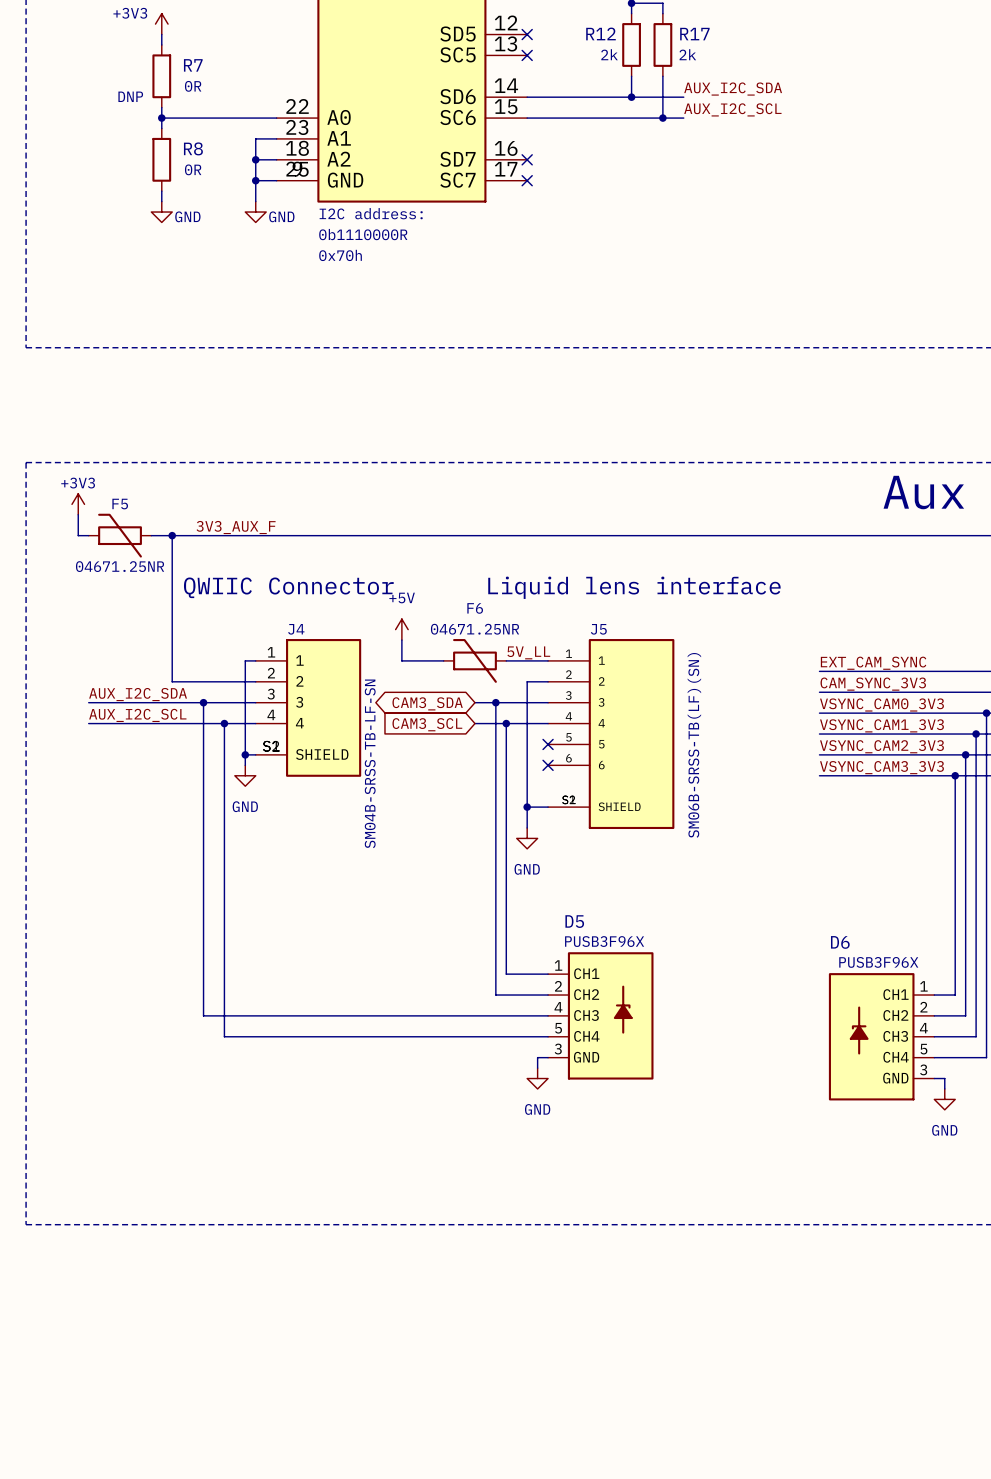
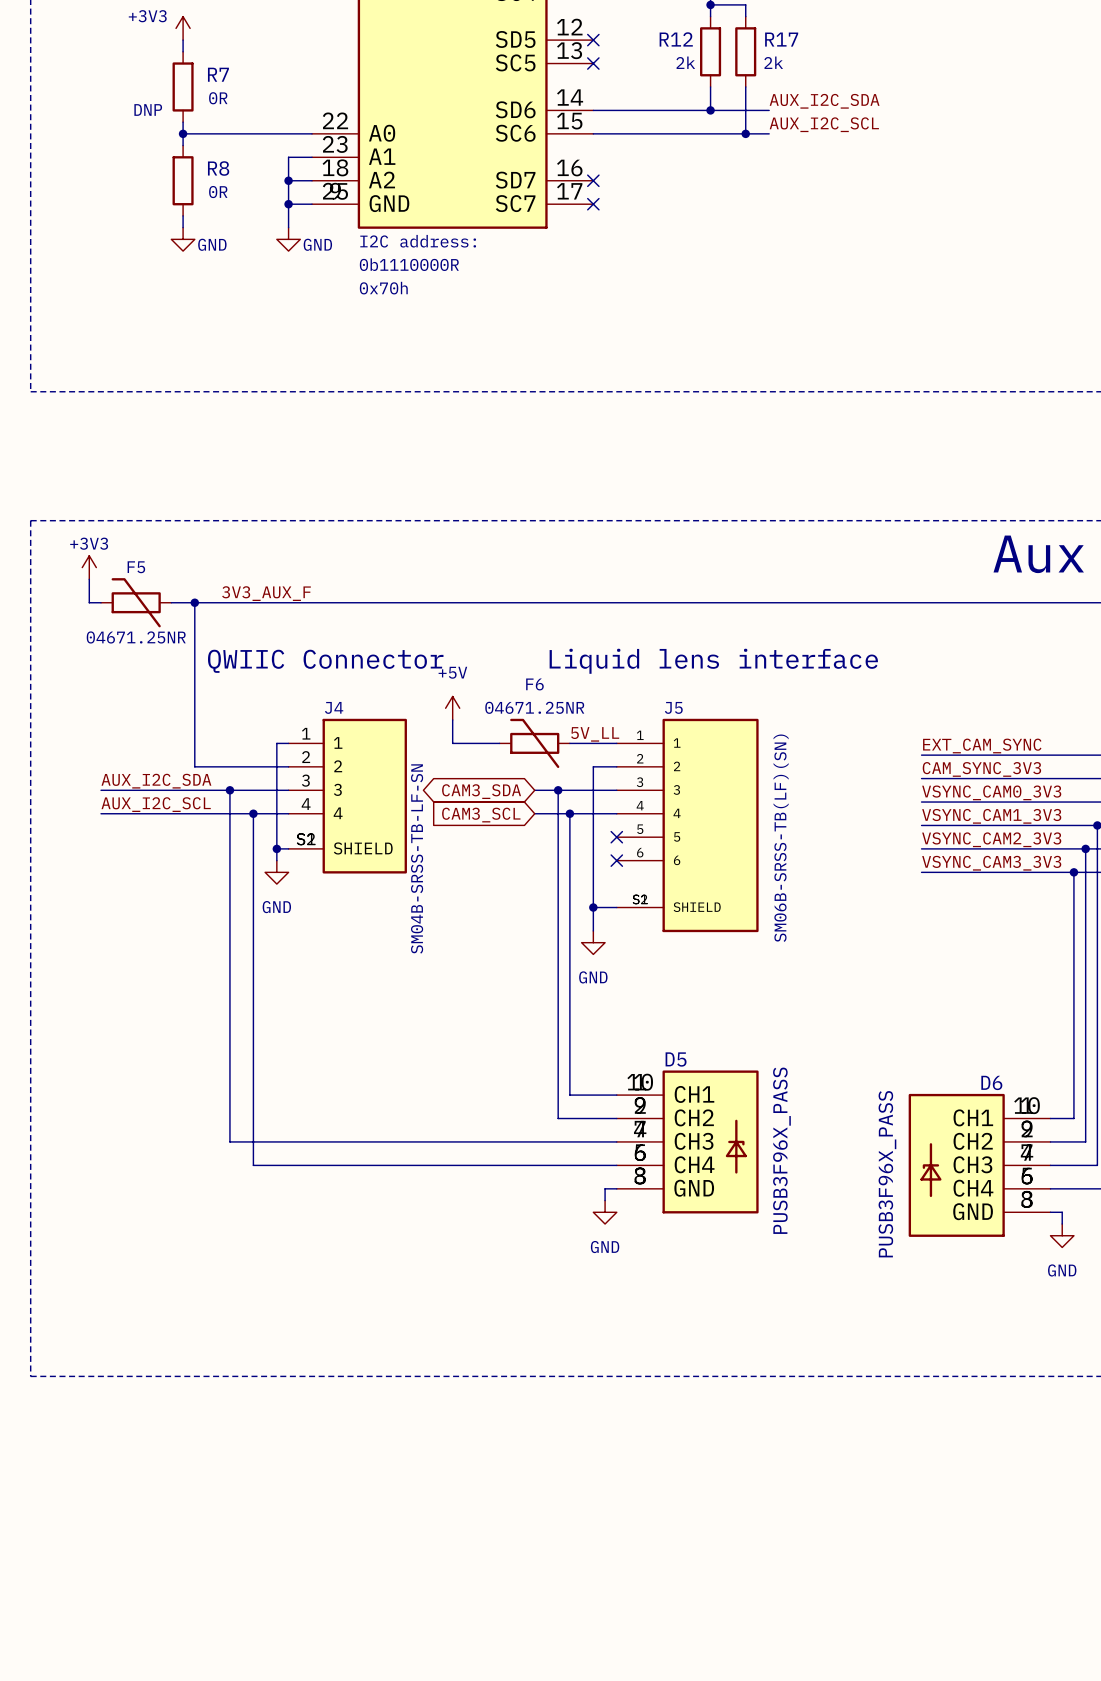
D5 name position: D5 (574, 921) -> D5 (676, 1059)
D5 text: PUSB3F96X (604, 941) -> none
D6 name position: D6 (840, 942) -> D6 (991, 1082)
D5 symbol: [548, 952, 654, 1080] -> [616, 1070, 759, 1214]
D6 text: PUSB3F96X (878, 962) -> none
D6 symbol: [828, 973, 935, 1101] -> [908, 1093, 1051, 1237]
D5 value: none -> PUSB3F96X_PASS (781, 1150)
D6 value: none -> PUSB3F96X_PASS (887, 1174)

